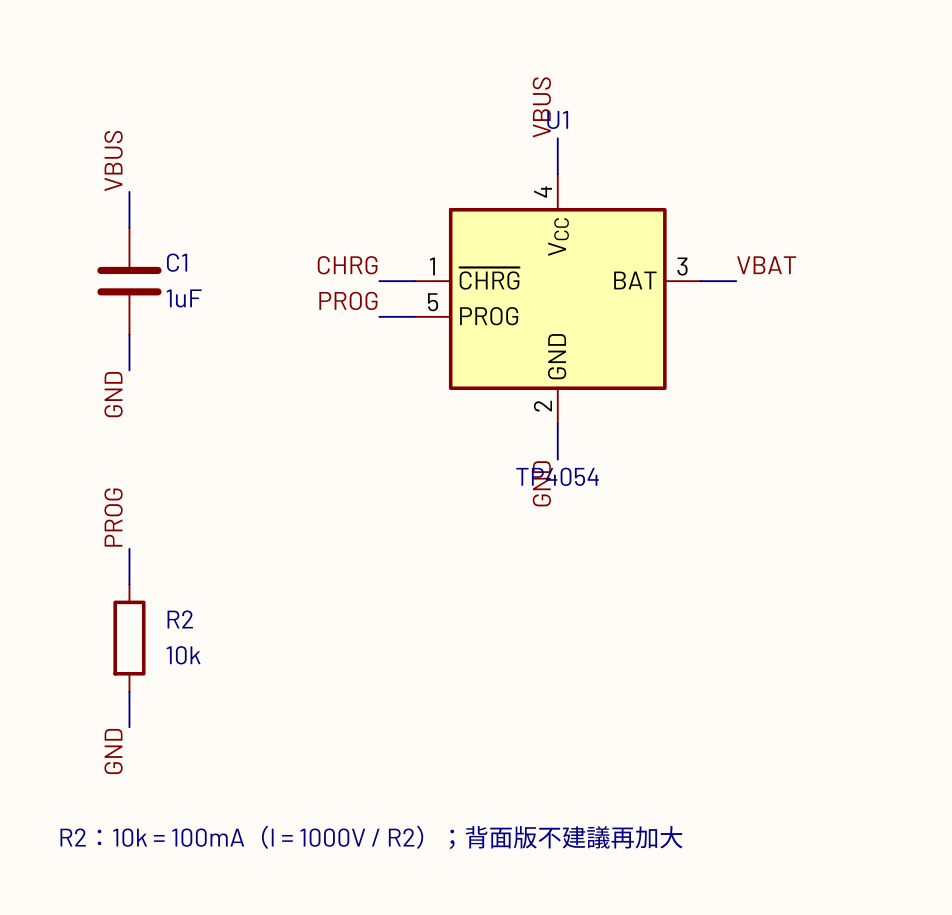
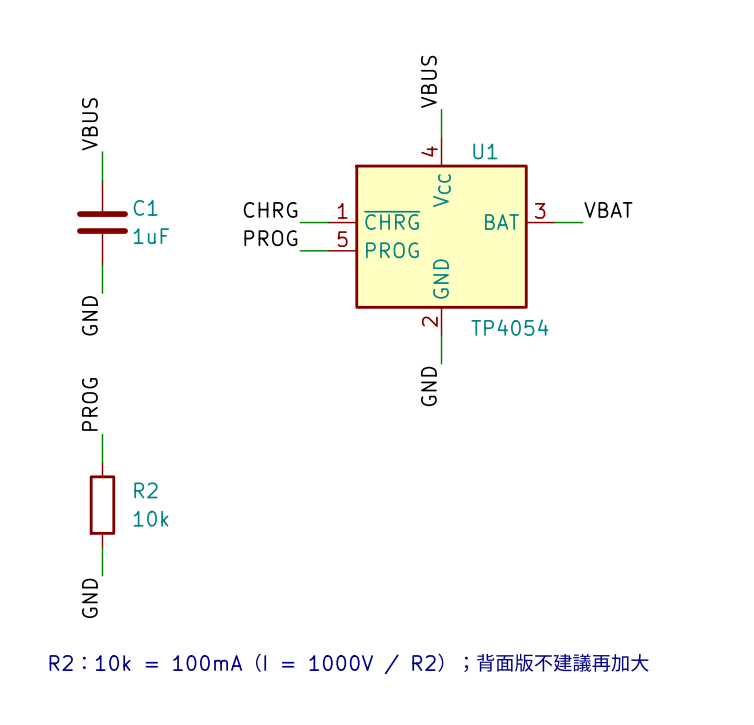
U1 name position: U1 (557, 119) -> U1 (485, 151)
U1 value position: TP4054 (557, 476) -> TP4054 (509, 327)

